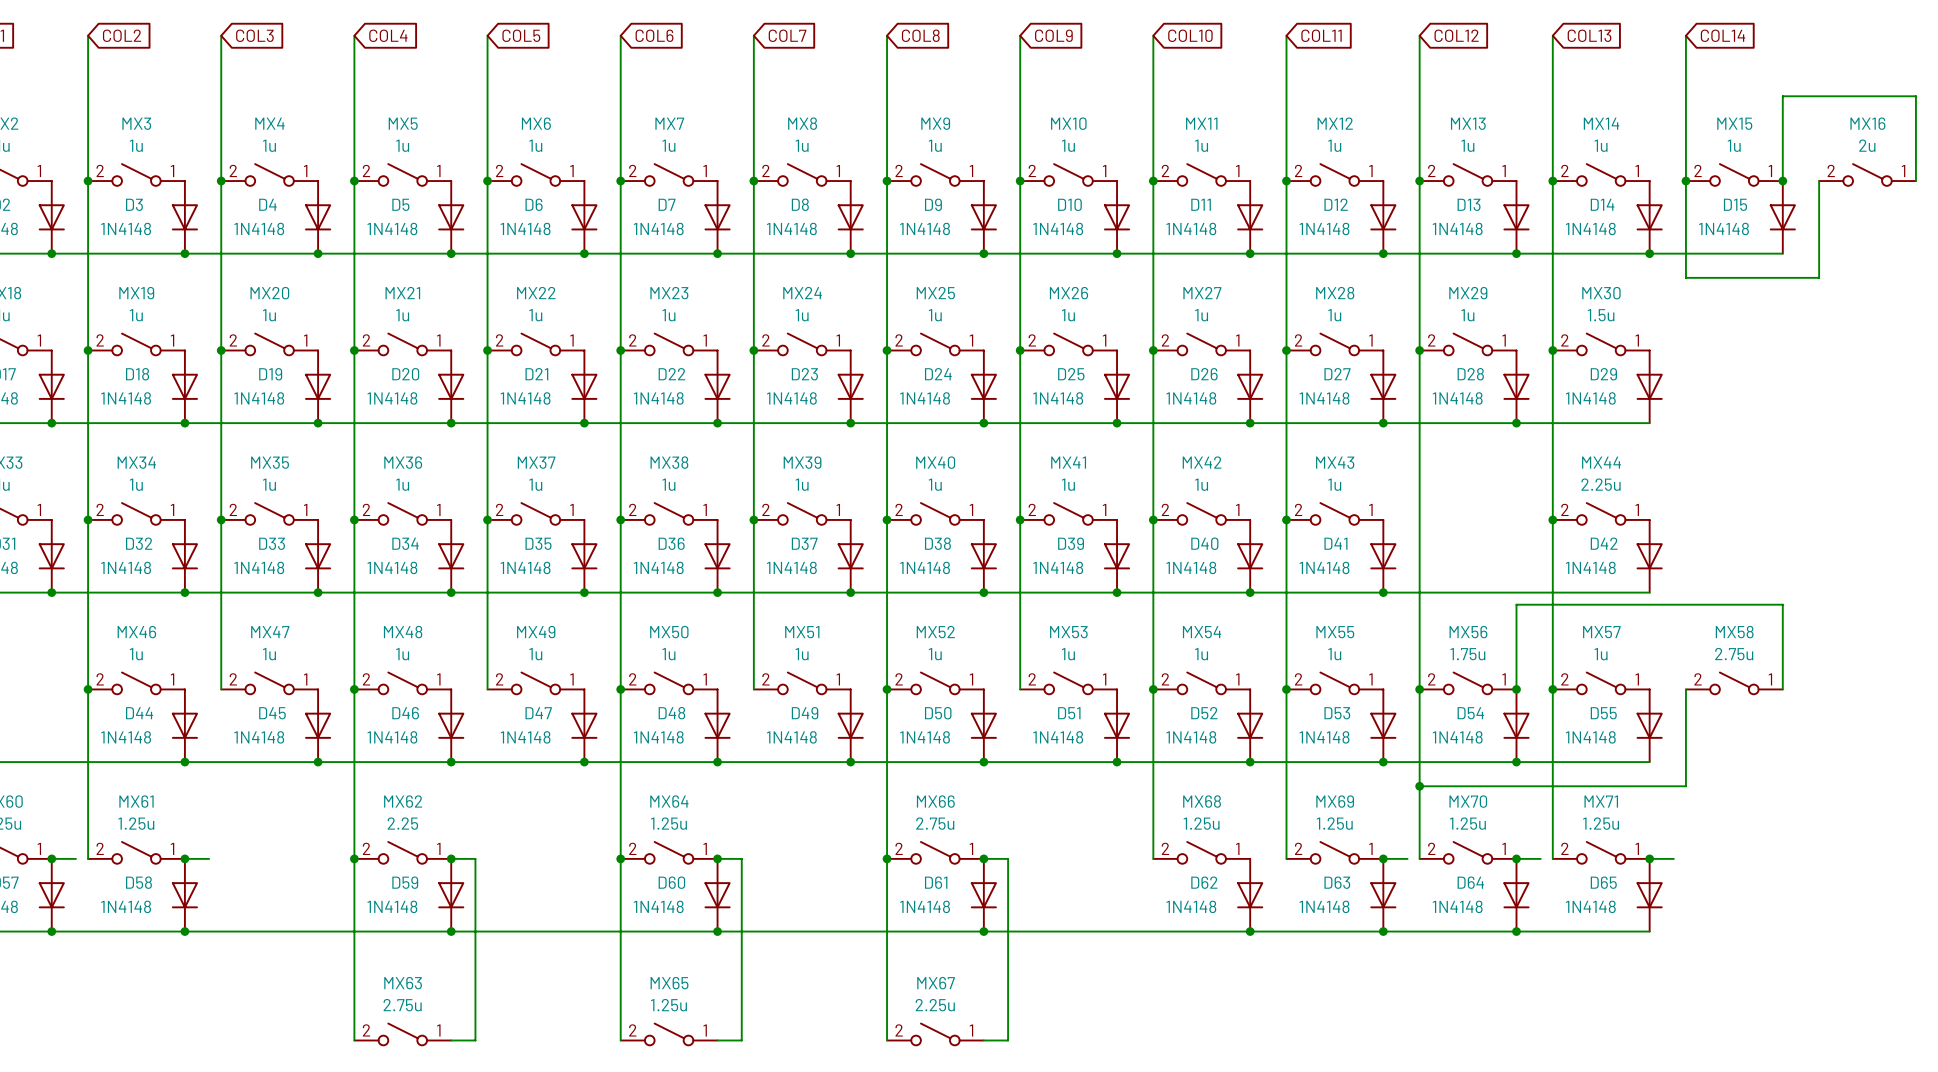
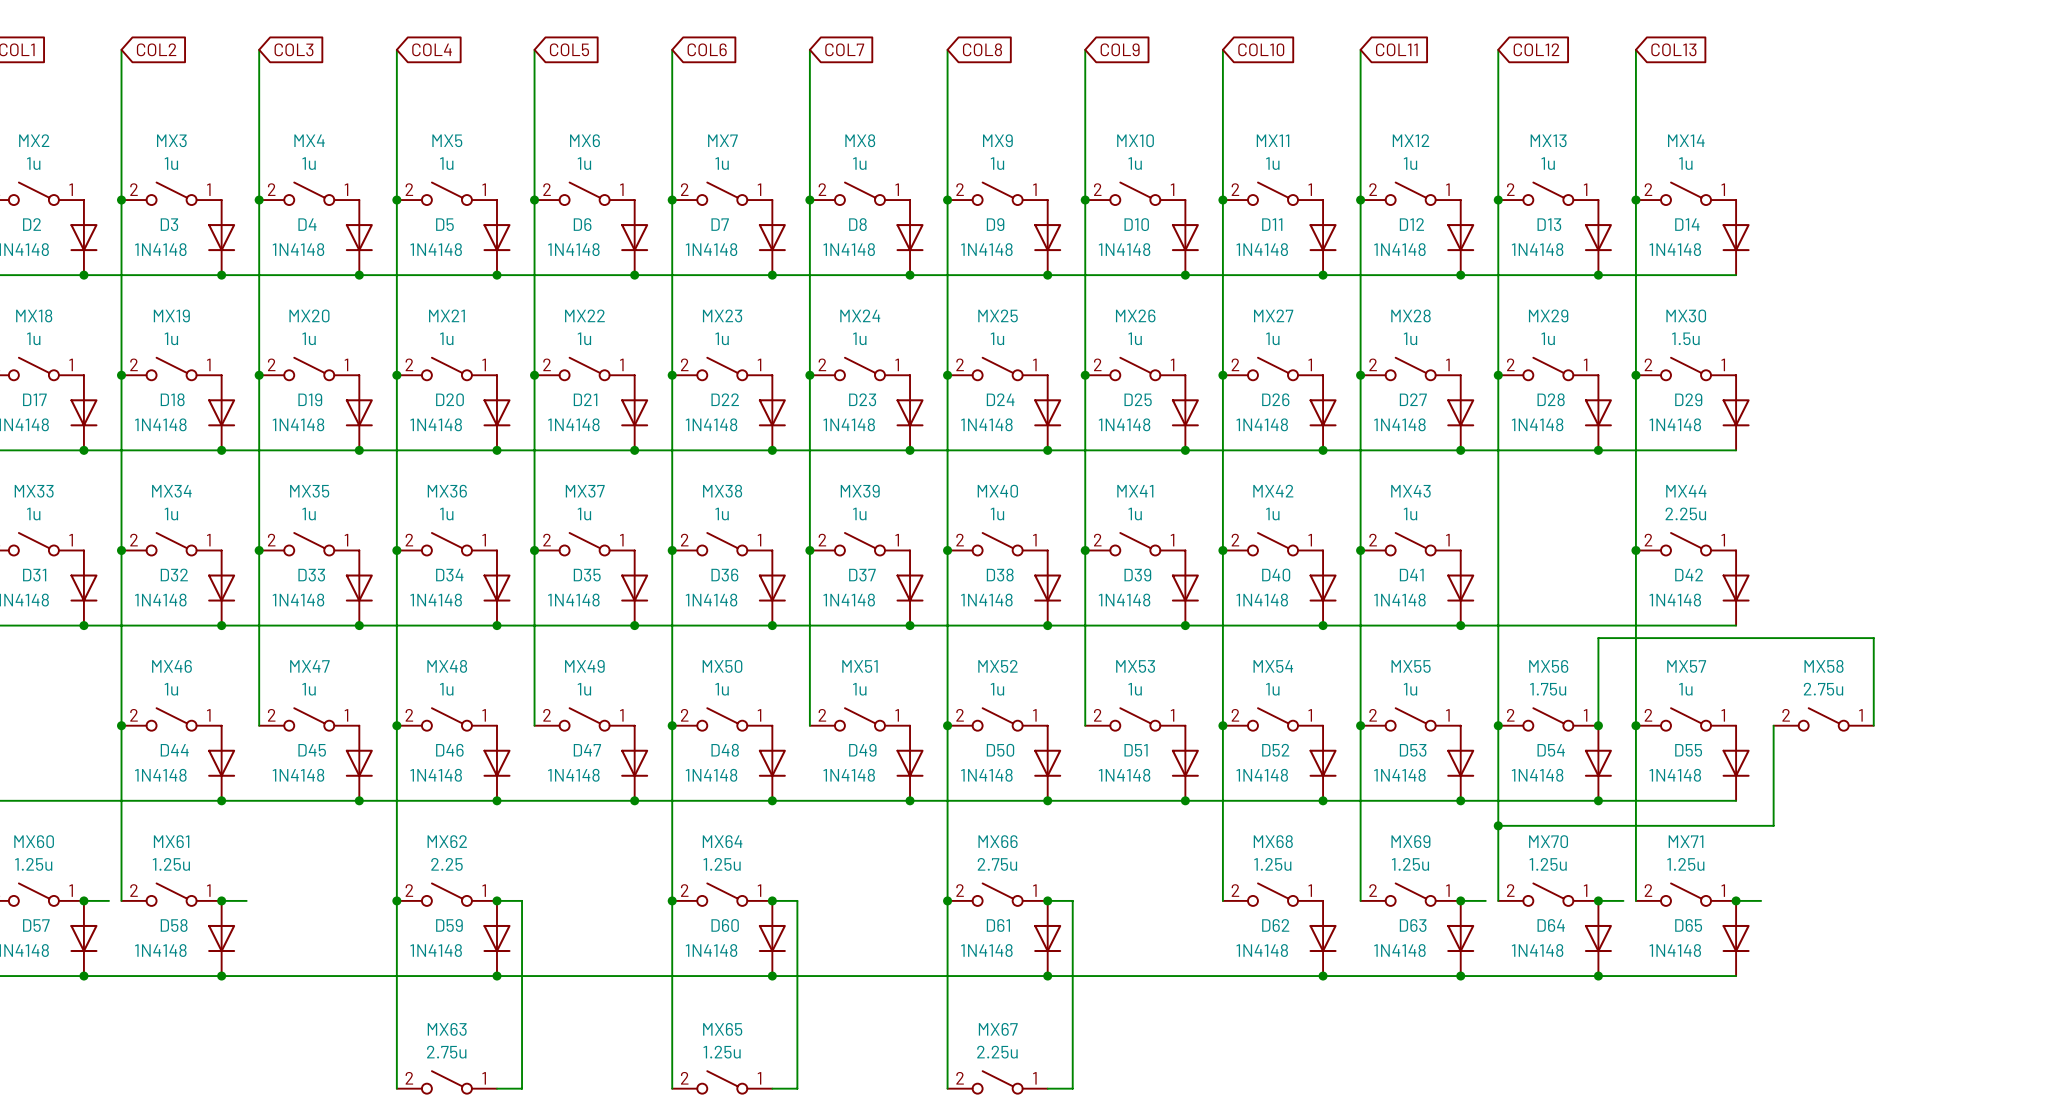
wire: (1685, 35) (1685, 277) (1819, 277) (1819, 181) -> none
global label: COL14 (1723, 35) -> none
MX15: 1u (1734, 174) -> none
MX16: 2u (1867, 174) -> none
junction: (1685, 181) -> none
wire: (1782, 181) (1782, 96) (1915, 96) (1915, 181) -> none
junction: (1782, 181) -> none
D15: 1N4148 (1782, 217) -> none
wire: (1649, 253) (1782, 253) -> none
junction: (1649, 253) -> none

